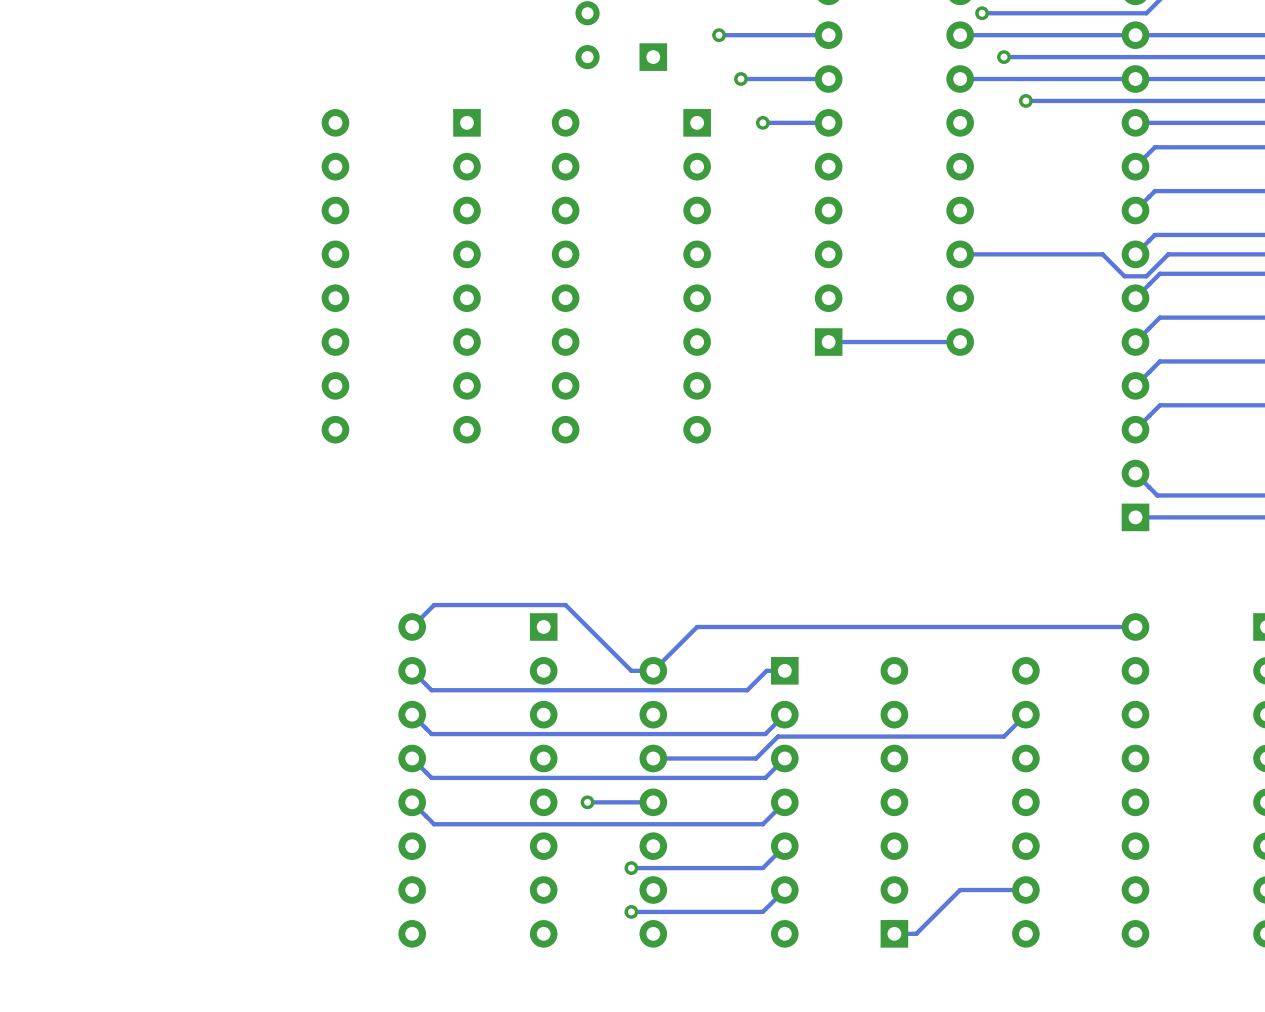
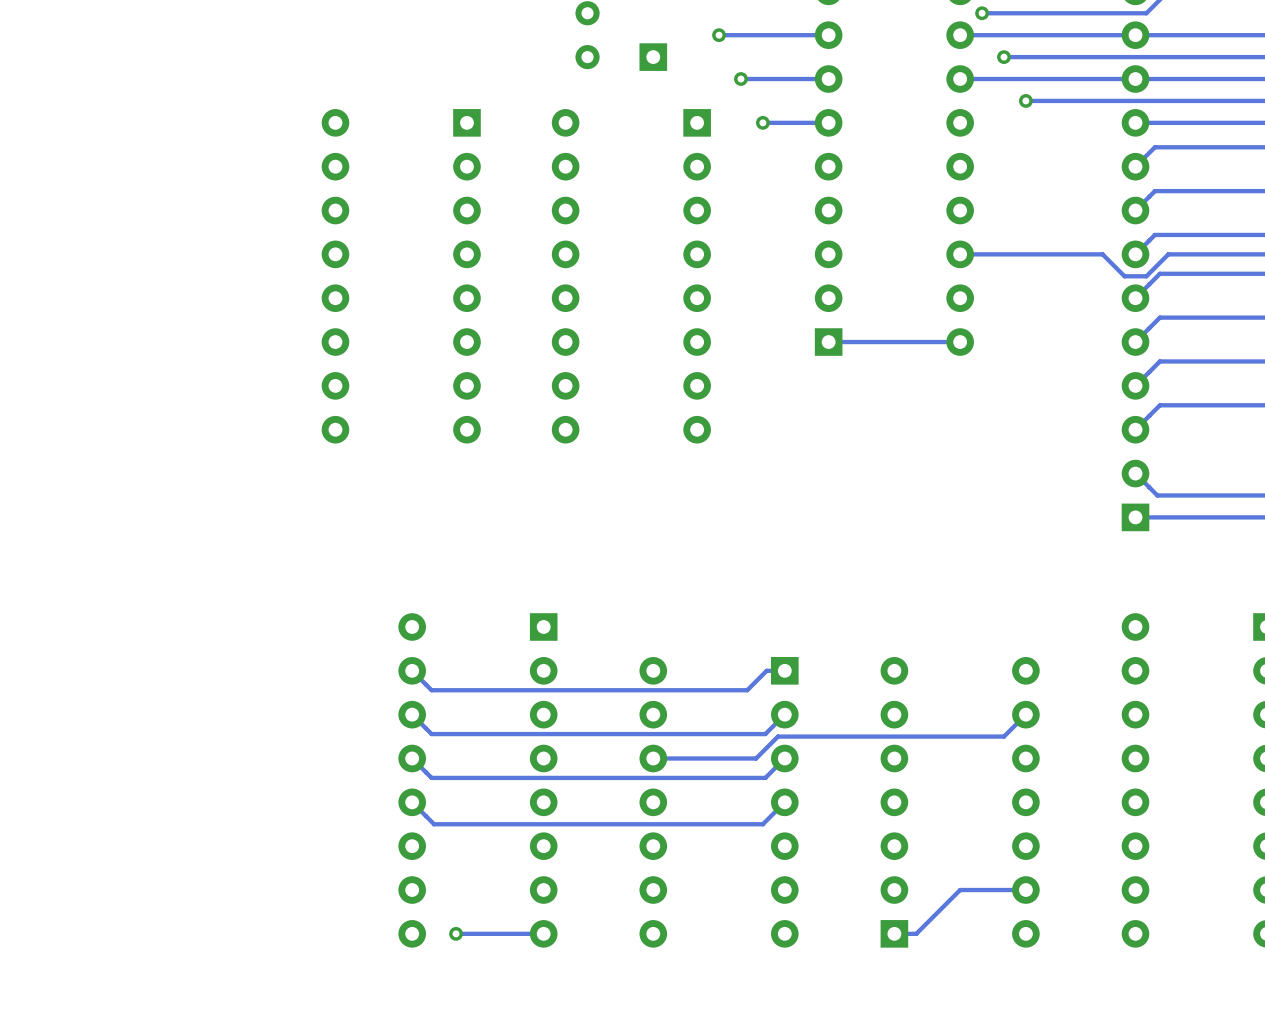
track: (1135, 626) (697, 626) (653, 670) (631, 670) (565, 605) (434, 605) (412, 626) -> none
via: (587, 802) -> none
track: (653, 802) (587, 802) -> none
track: (784, 846) (762, 868) (631, 868) -> none
via: (631, 868) -> none
track: (784, 890) (762, 911) (631, 911) -> none
via: (631, 911) -> none
via: none -> (456, 933)
track: none -> (543, 933) (456, 933)

